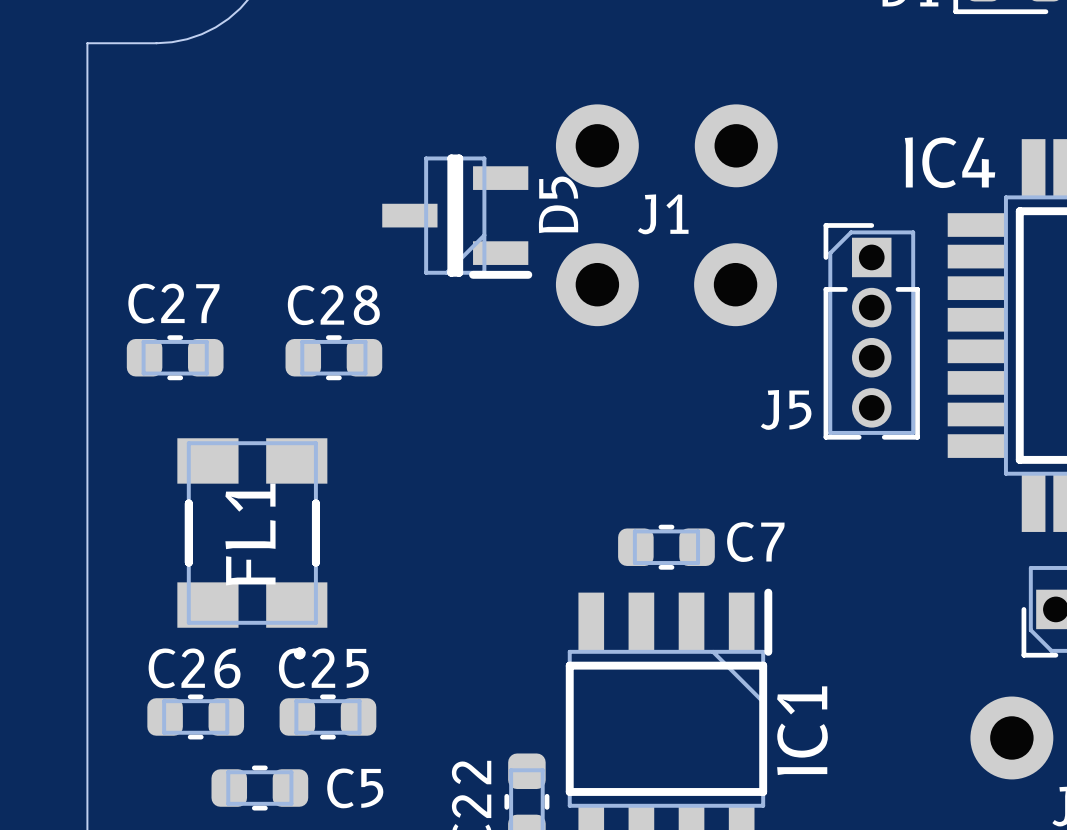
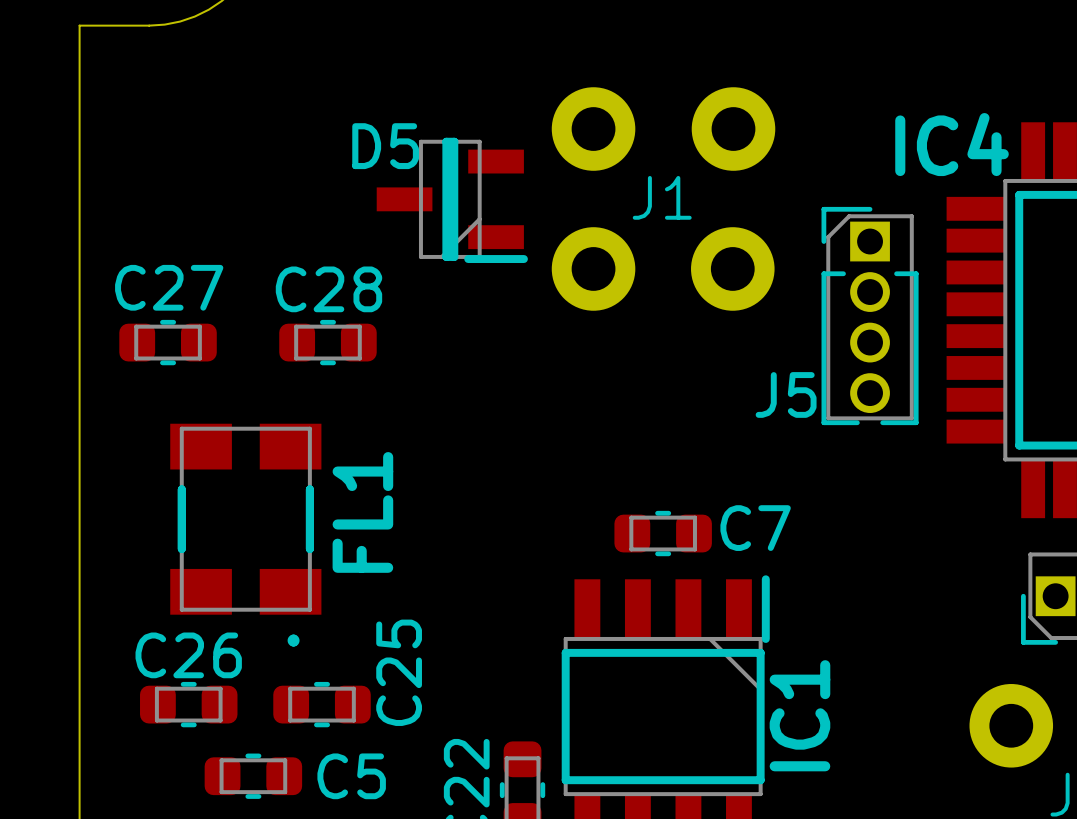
D5 name rotation: 0° (558, 204) -> 90° clockwise (385, 146)
D5 name position: D5 (558, 204) -> D5 (385, 146)
FL1 name position: FL1 (250, 534) -> FL1 (362, 512)
C25 name rotation: 0° (323, 668) -> 90° counterclockwise (399, 672)

